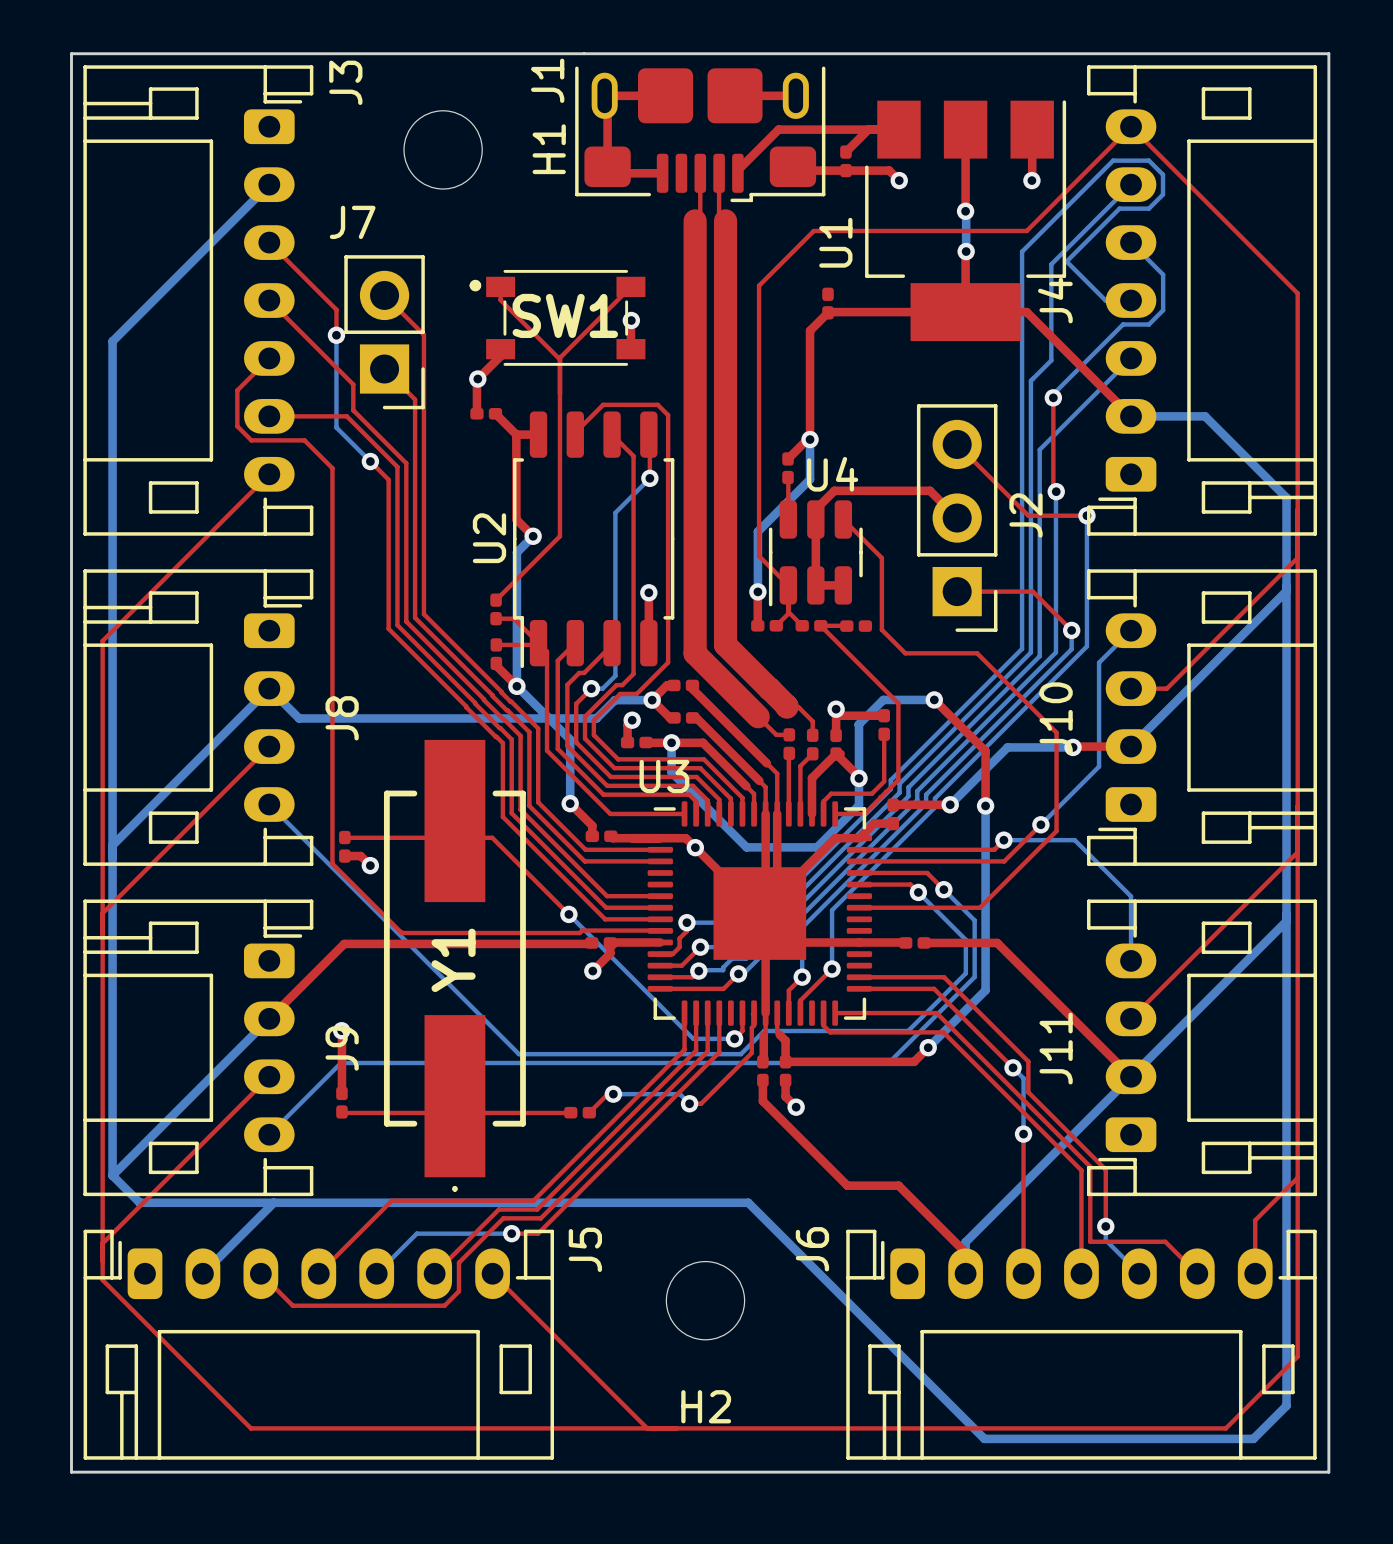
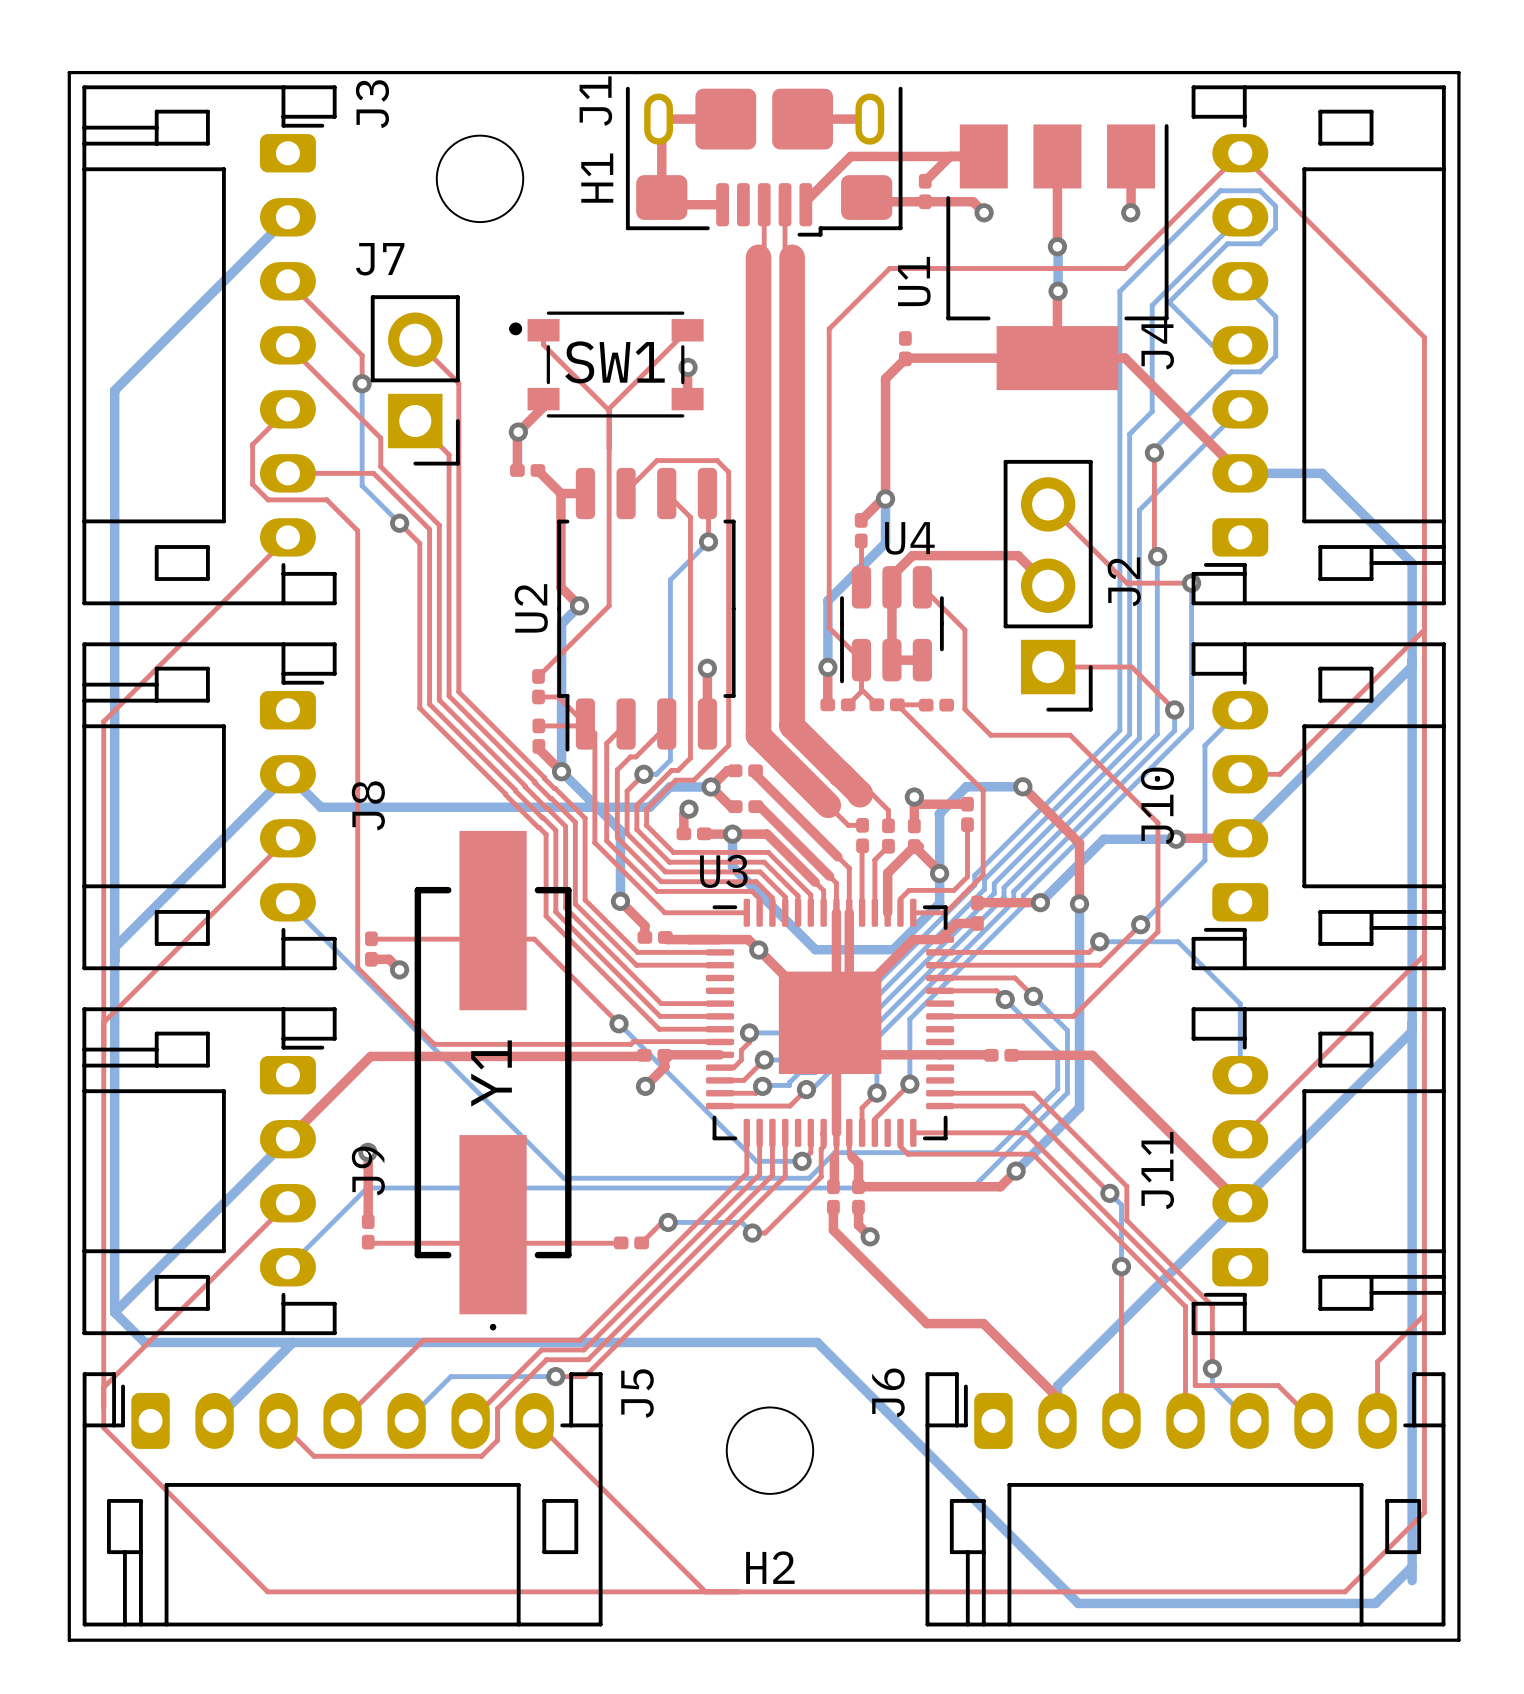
bottom track: none -> (1412, 1566) (1412, 1580)

